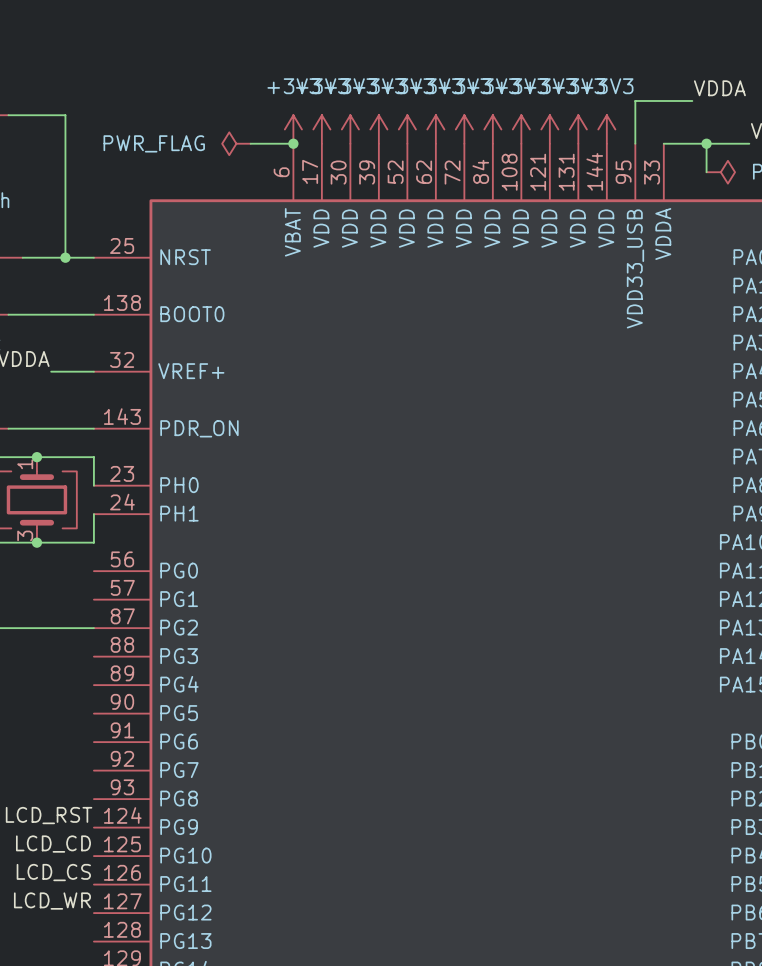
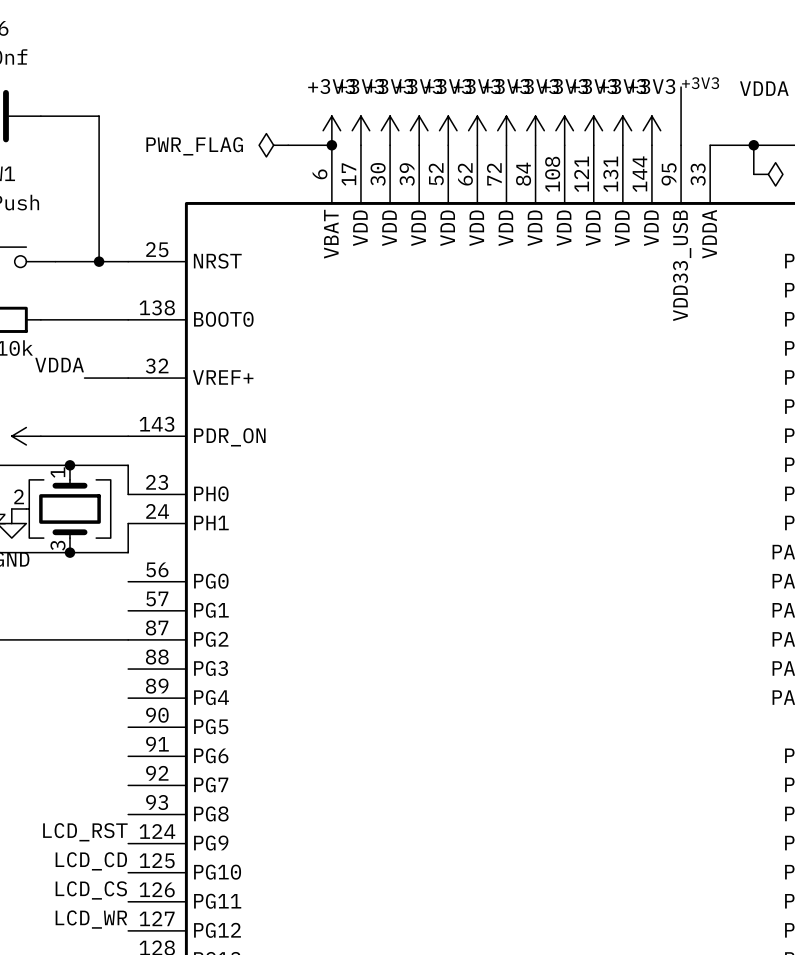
label: none -> +3V3 (700, 83)
wire: (635, 100) (692, 100) -> (681, 101) (681, 87)

